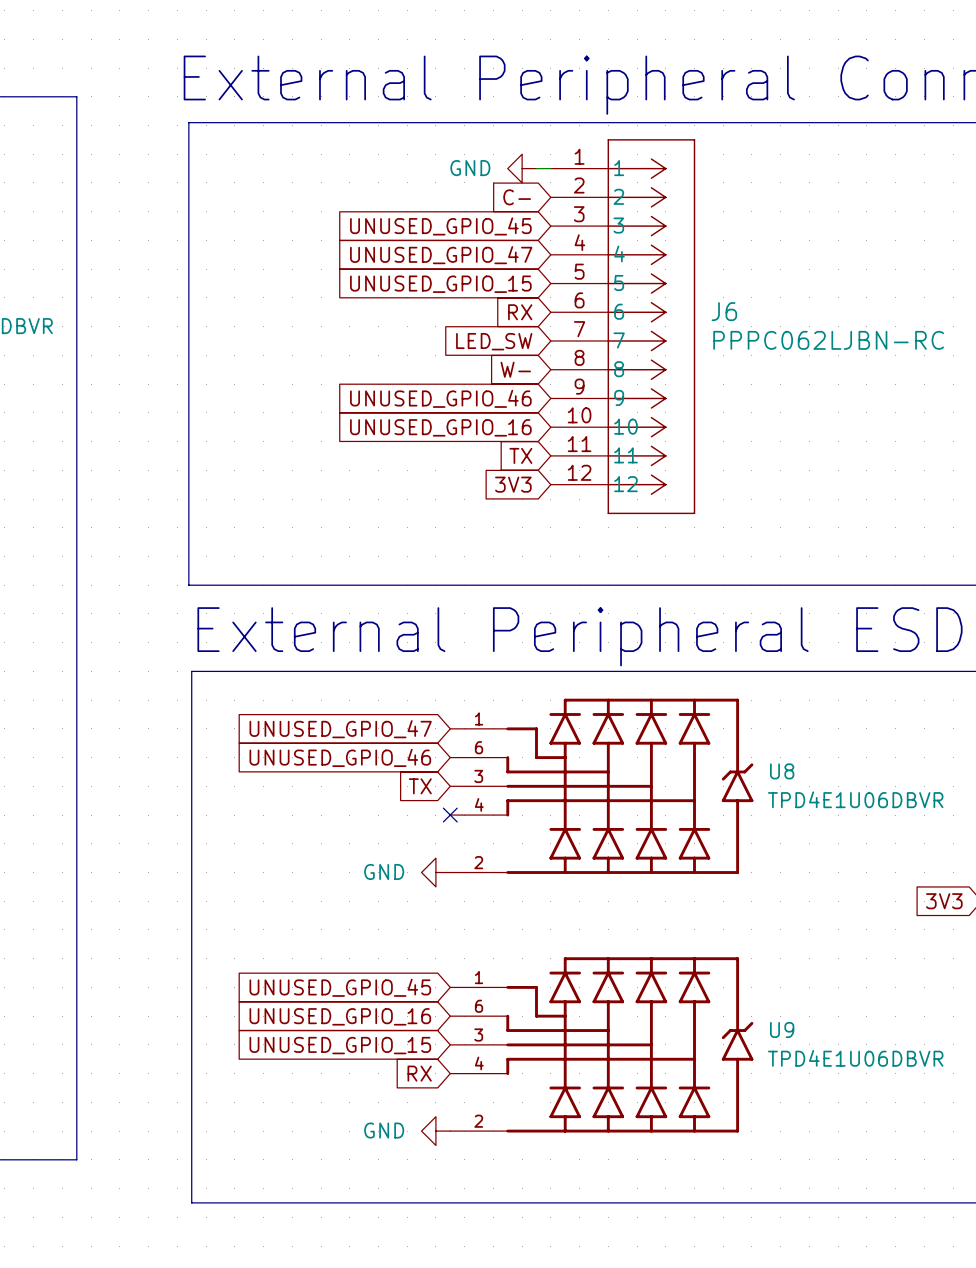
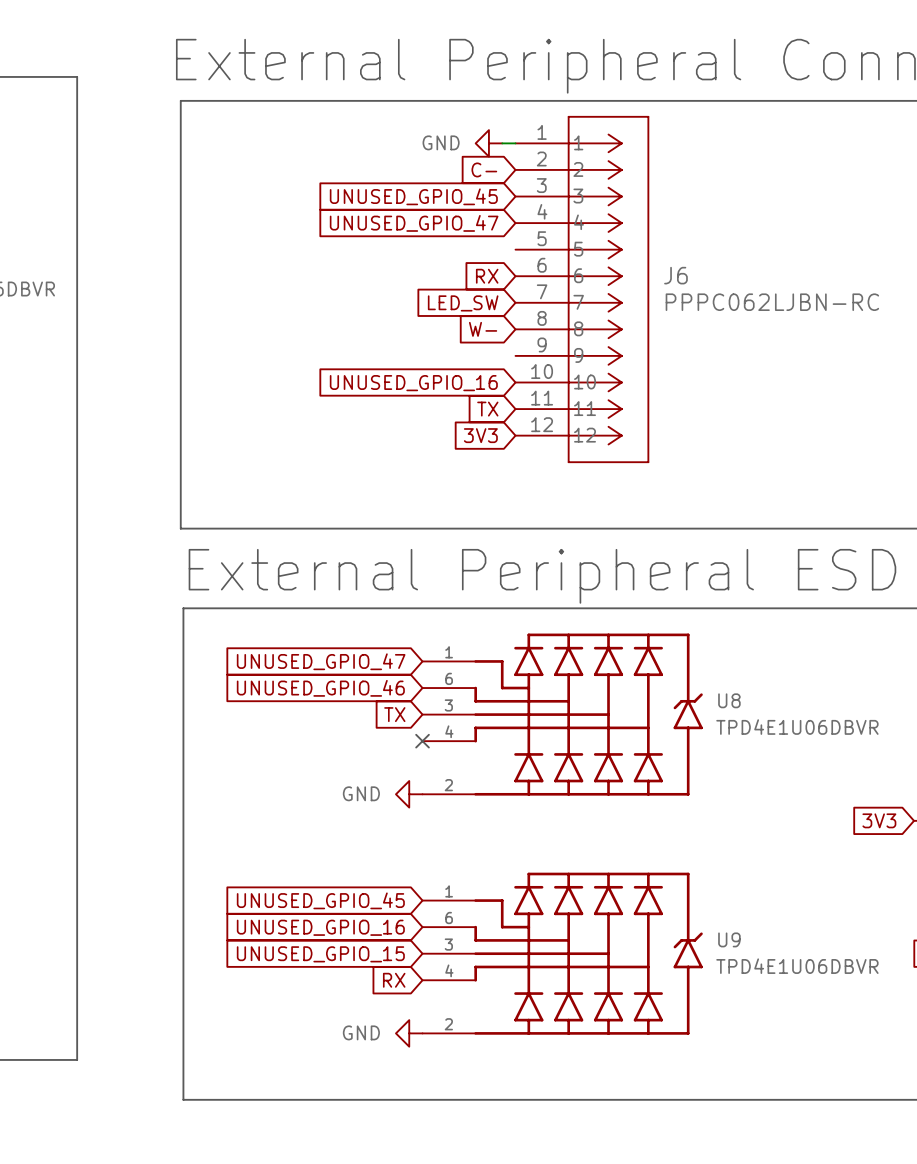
global label: UNUSED_GPIO_15 (440, 284) -> none
global label: UNUSED_GPIO_46 (440, 398) -> none

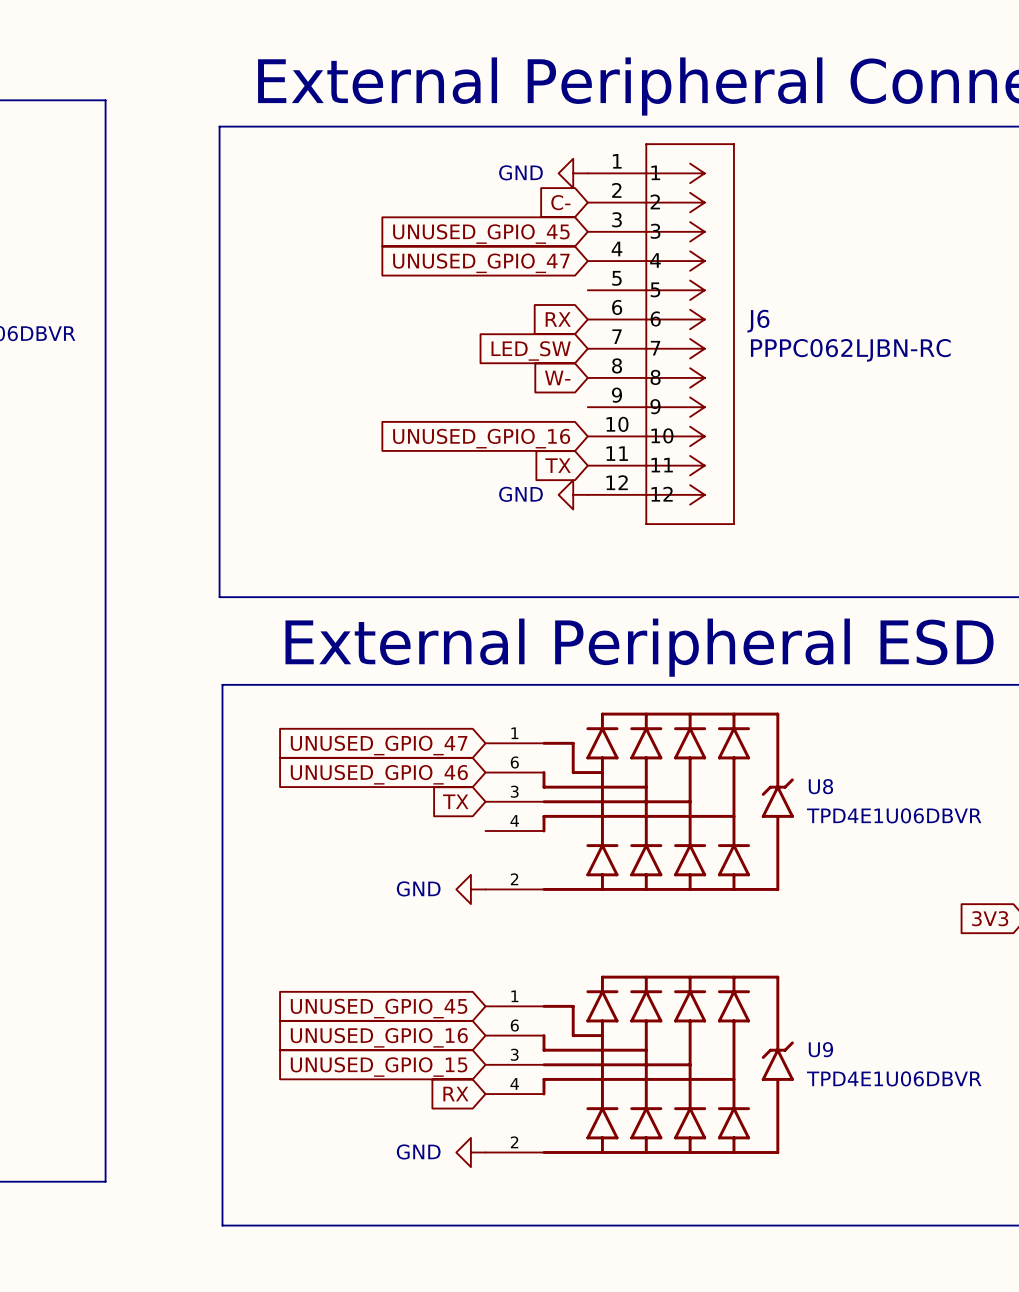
power symbol position: GND (488, 143) -> GND (573, 173)
global label: 3V3 (480, 435) -> none
power symbol: none -> GND (573, 494)
no-connect mark: (422, 741) -> none

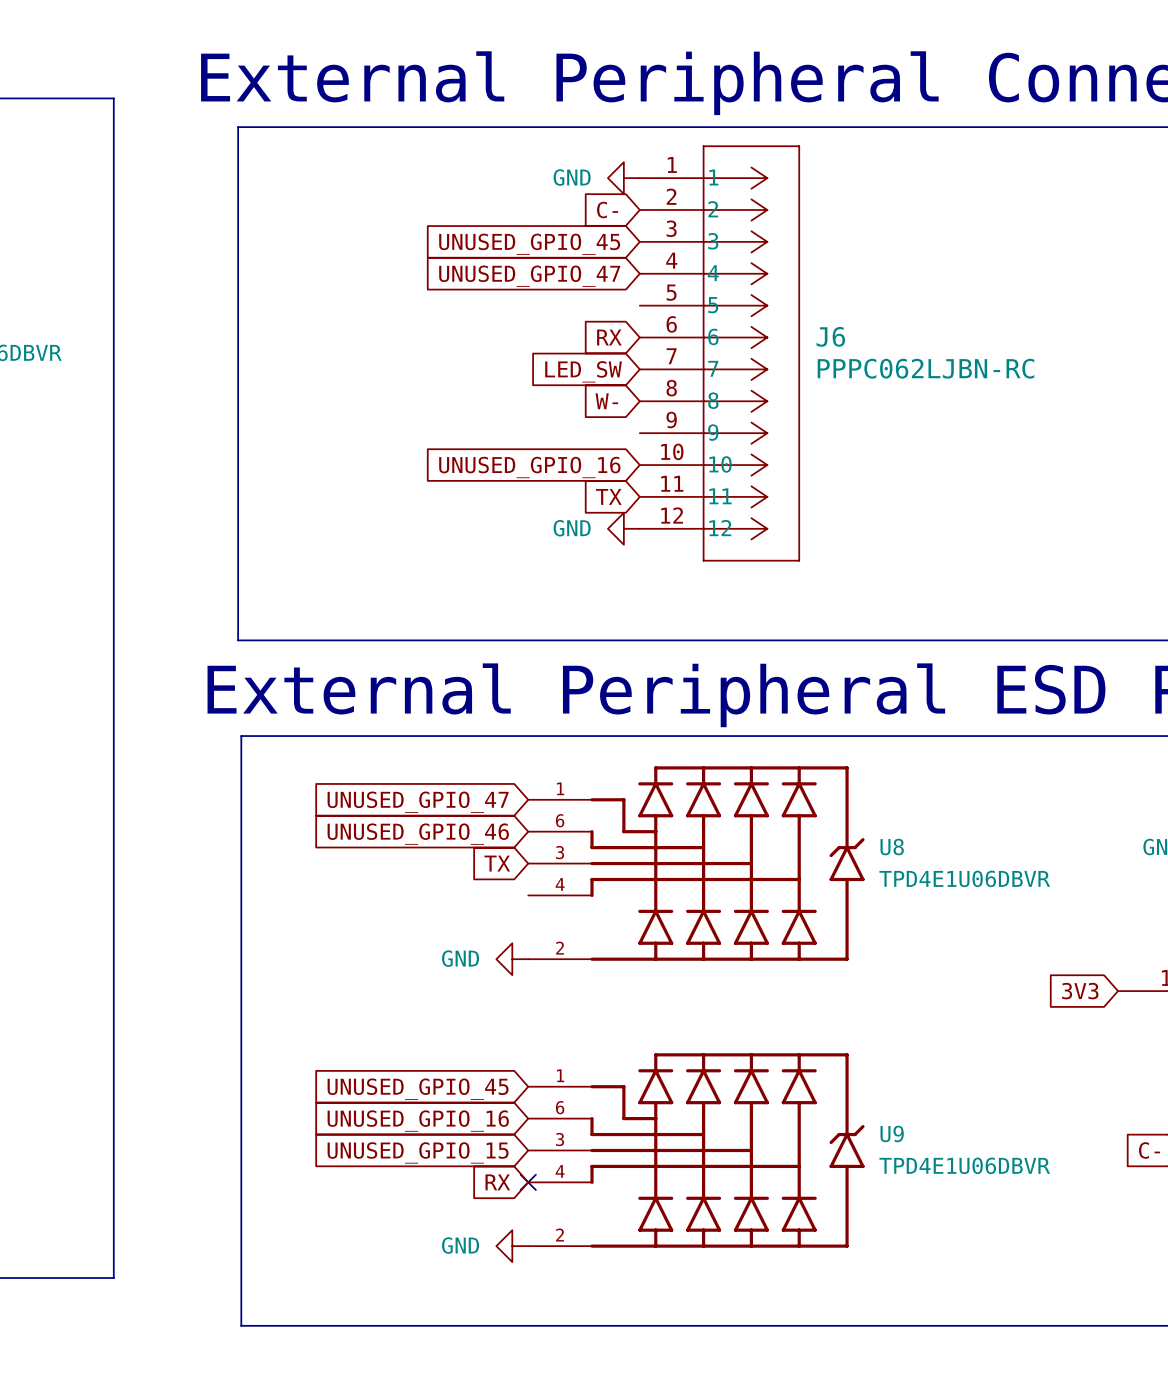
no-connect mark: none -> (528, 1182)

